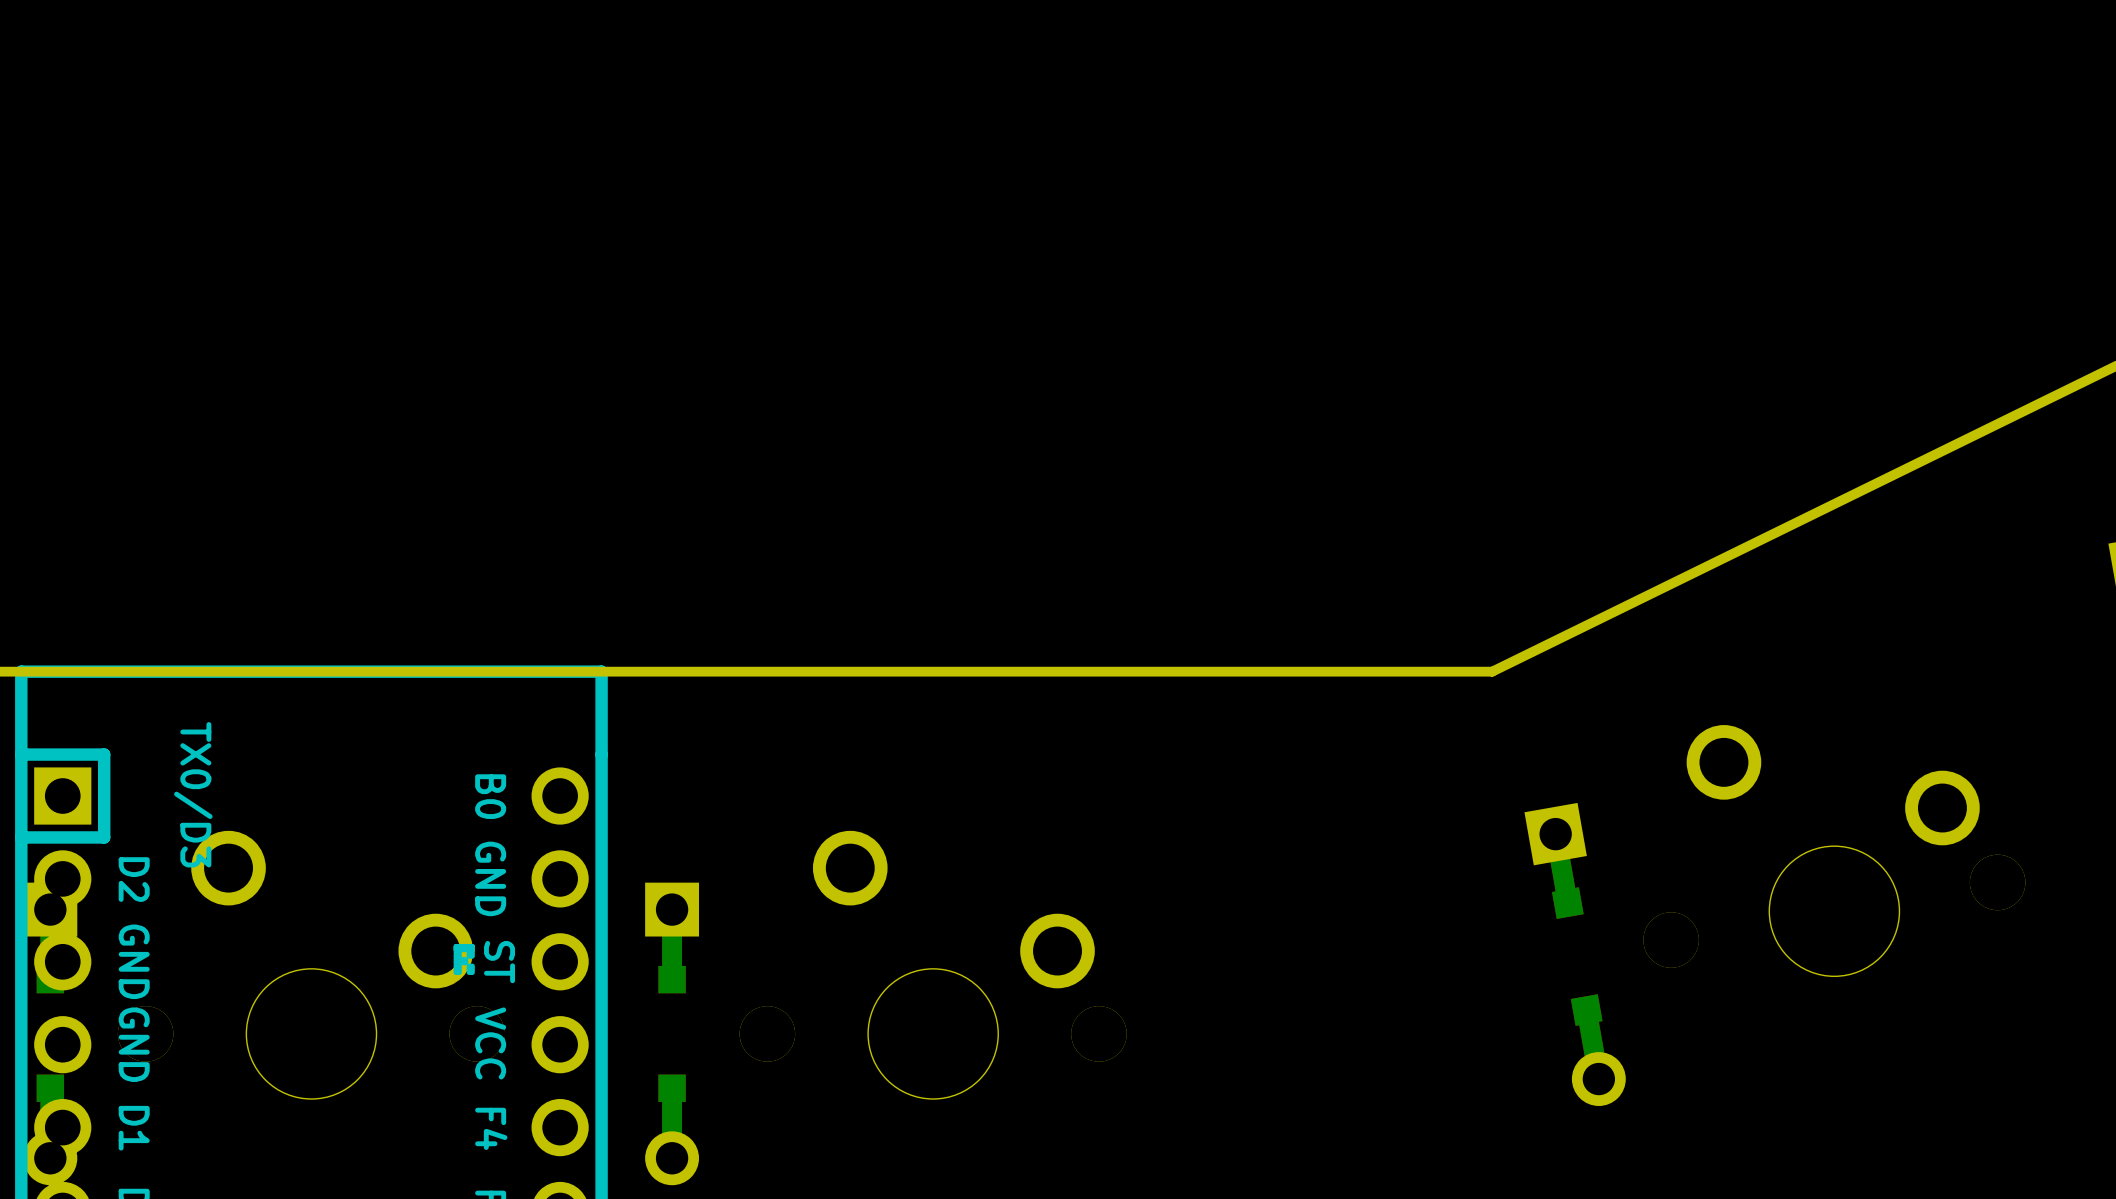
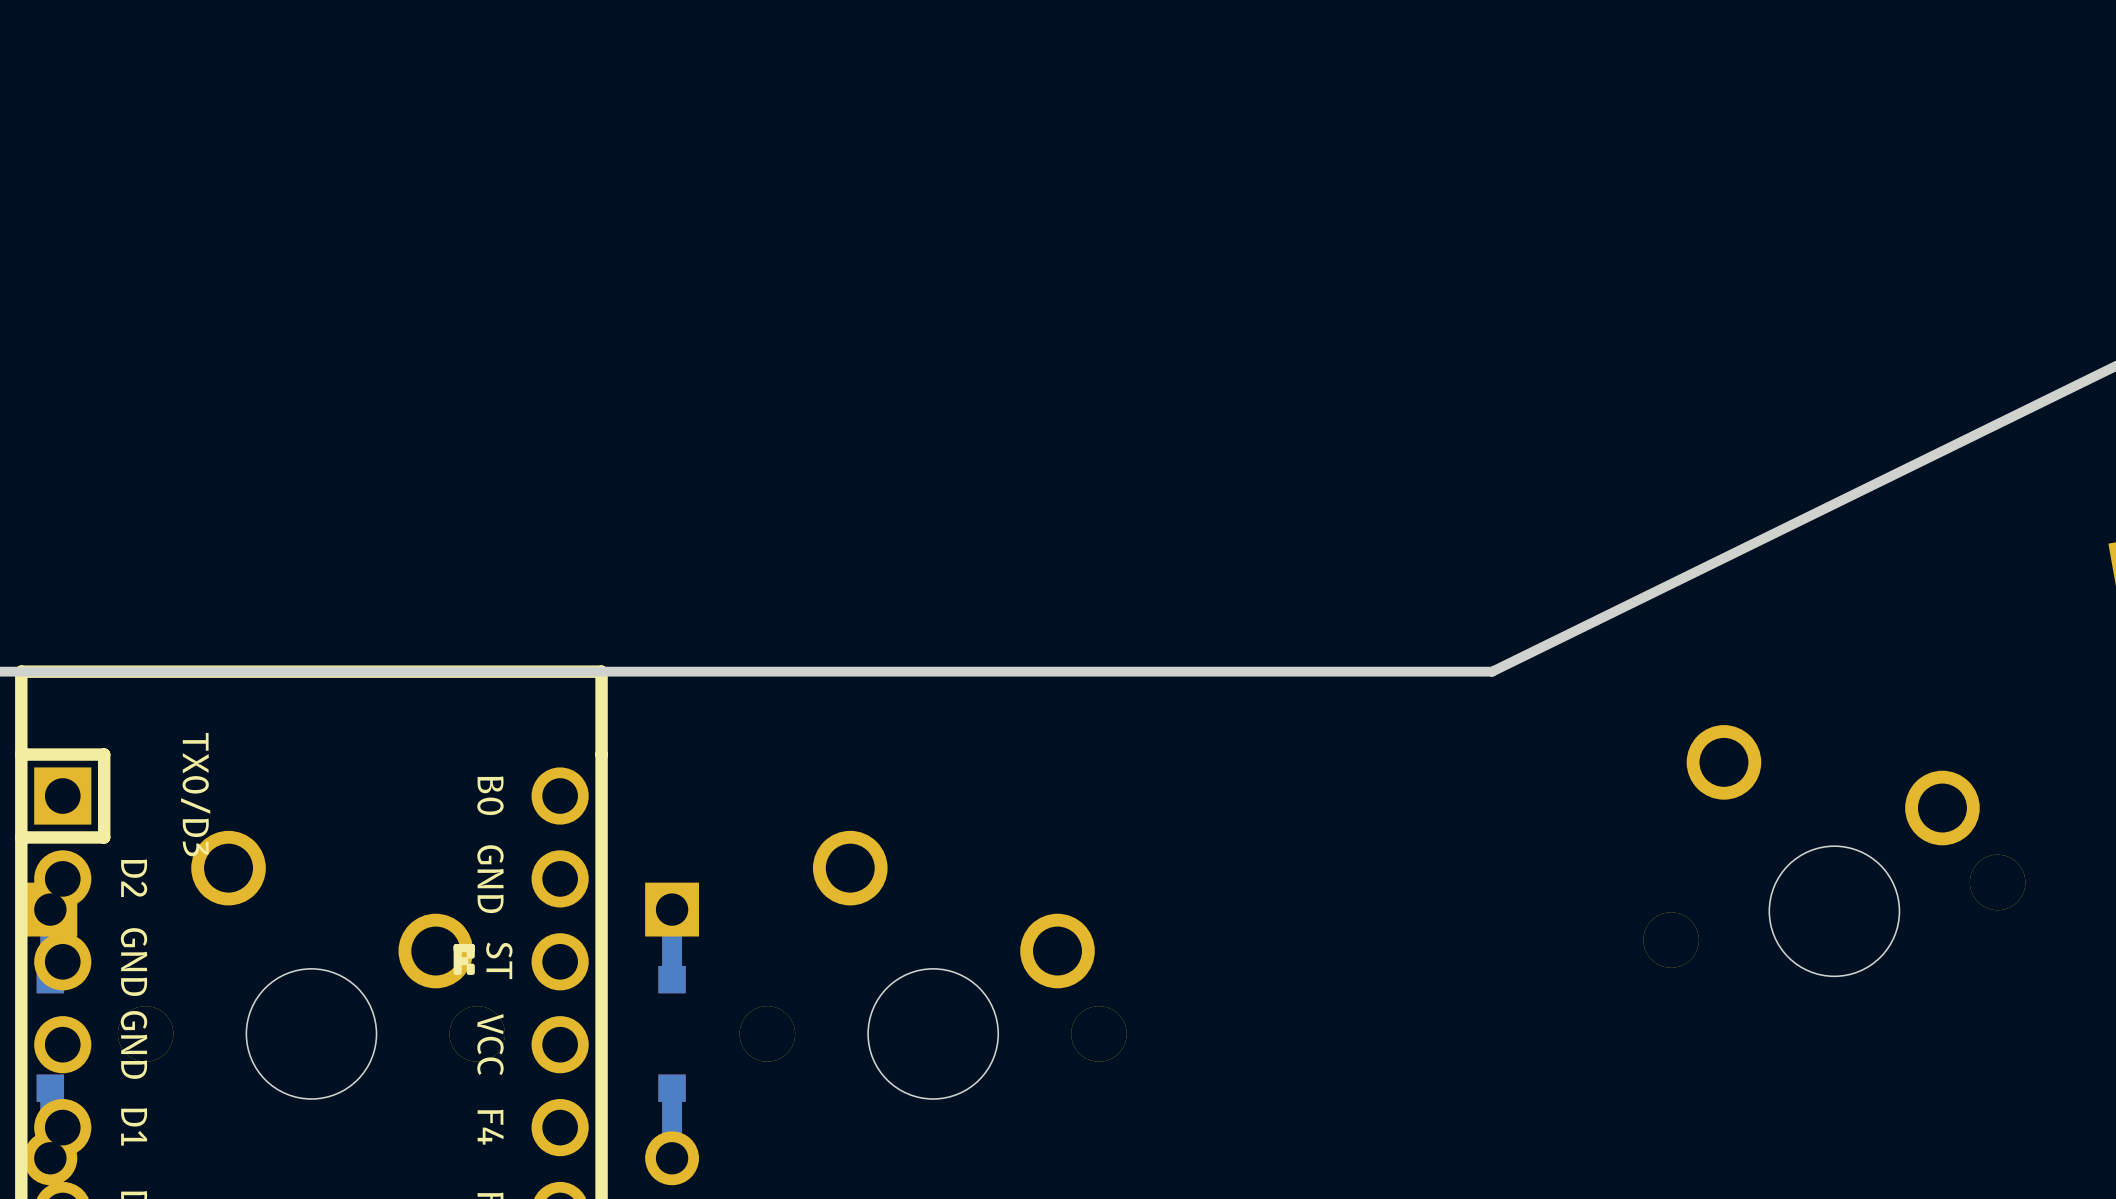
part: (1575, 954) -> none

